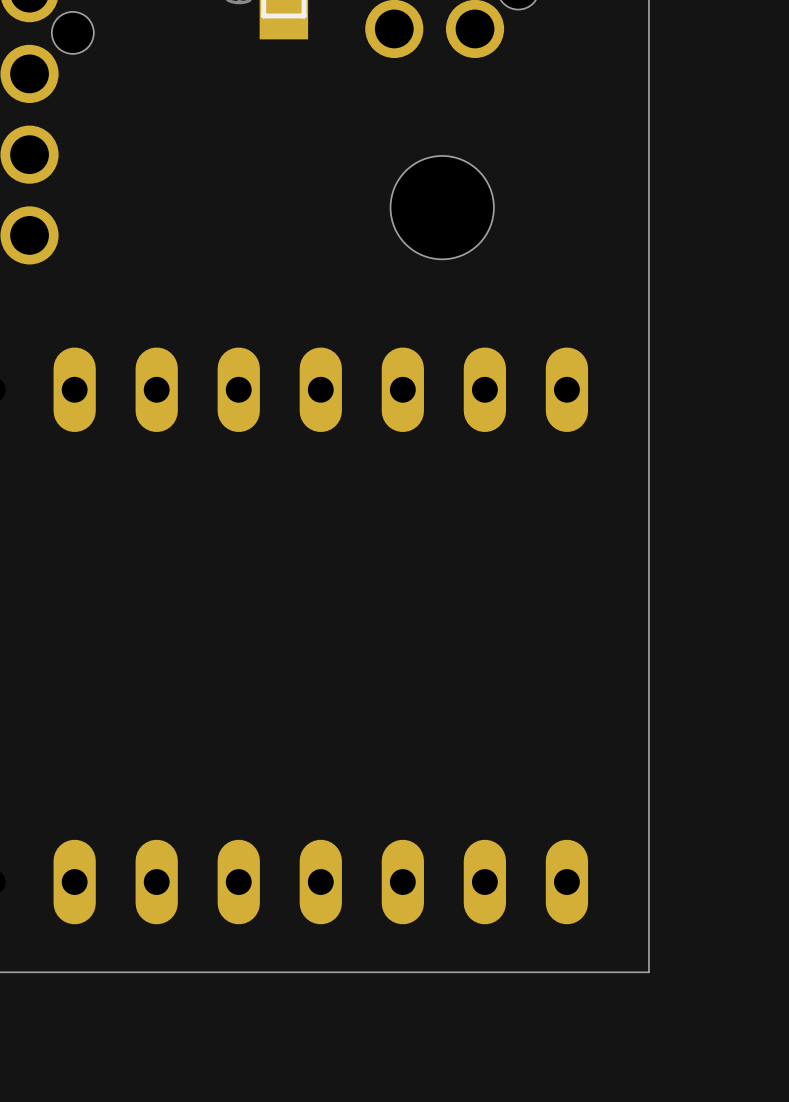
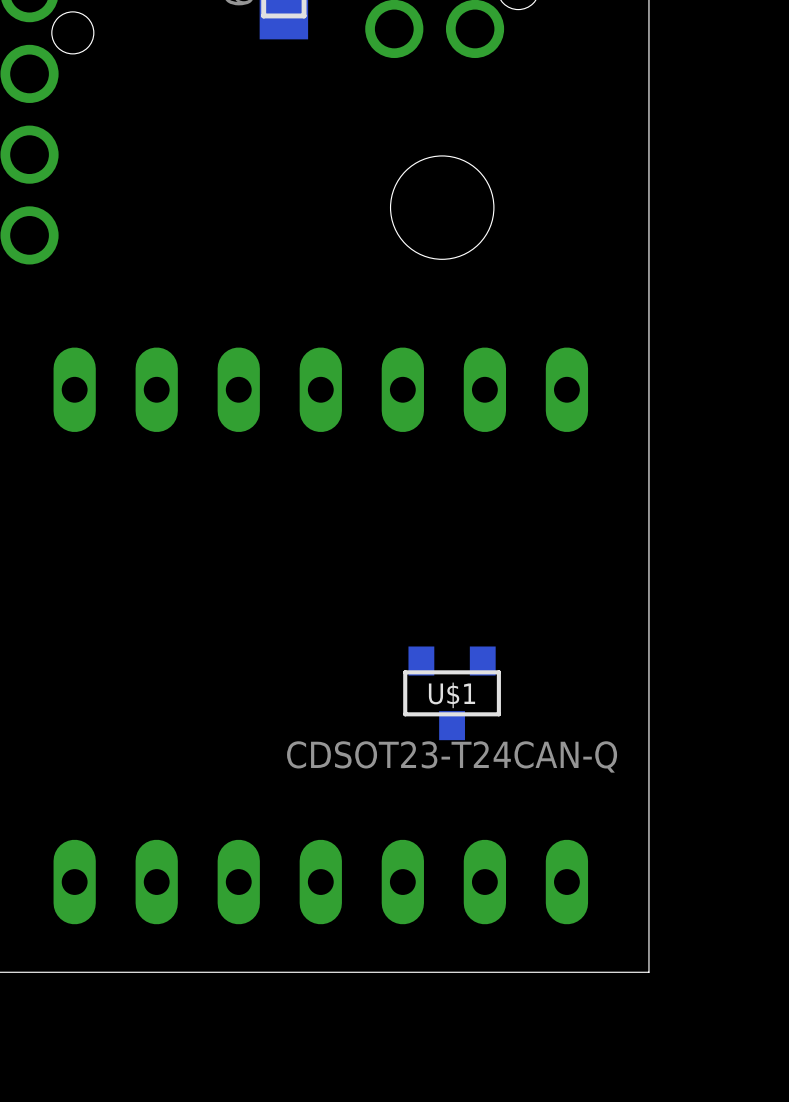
U$1: none -> CDSOT23-T24CAN-Q (452, 693)

